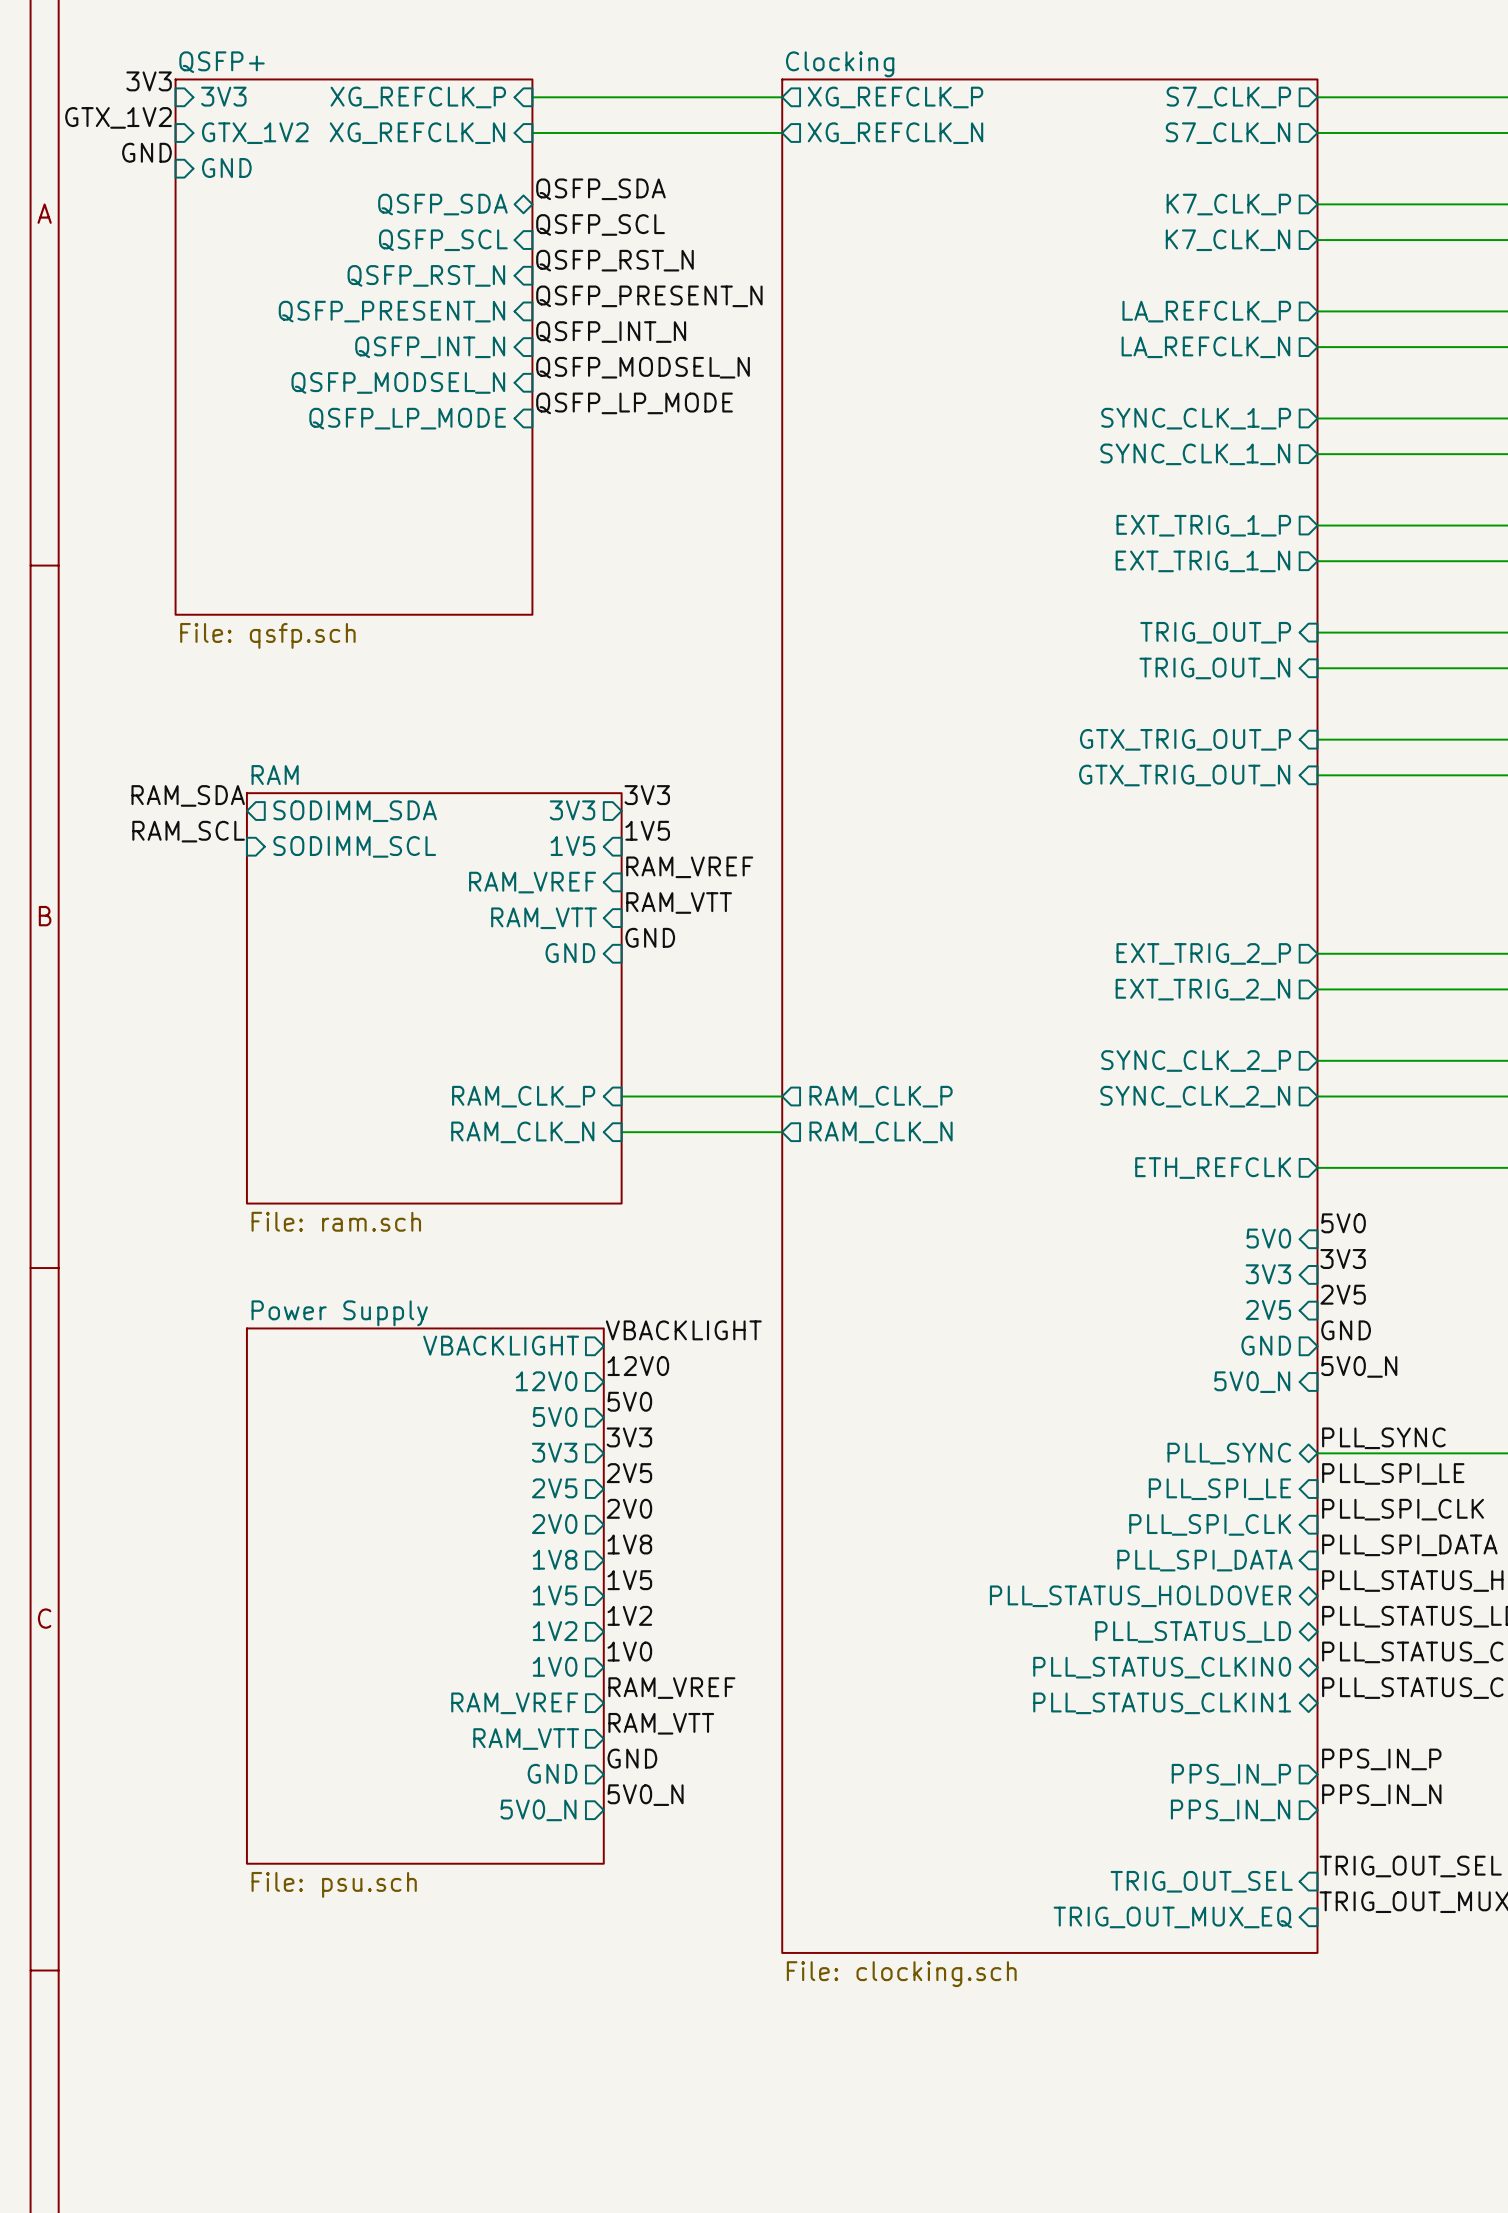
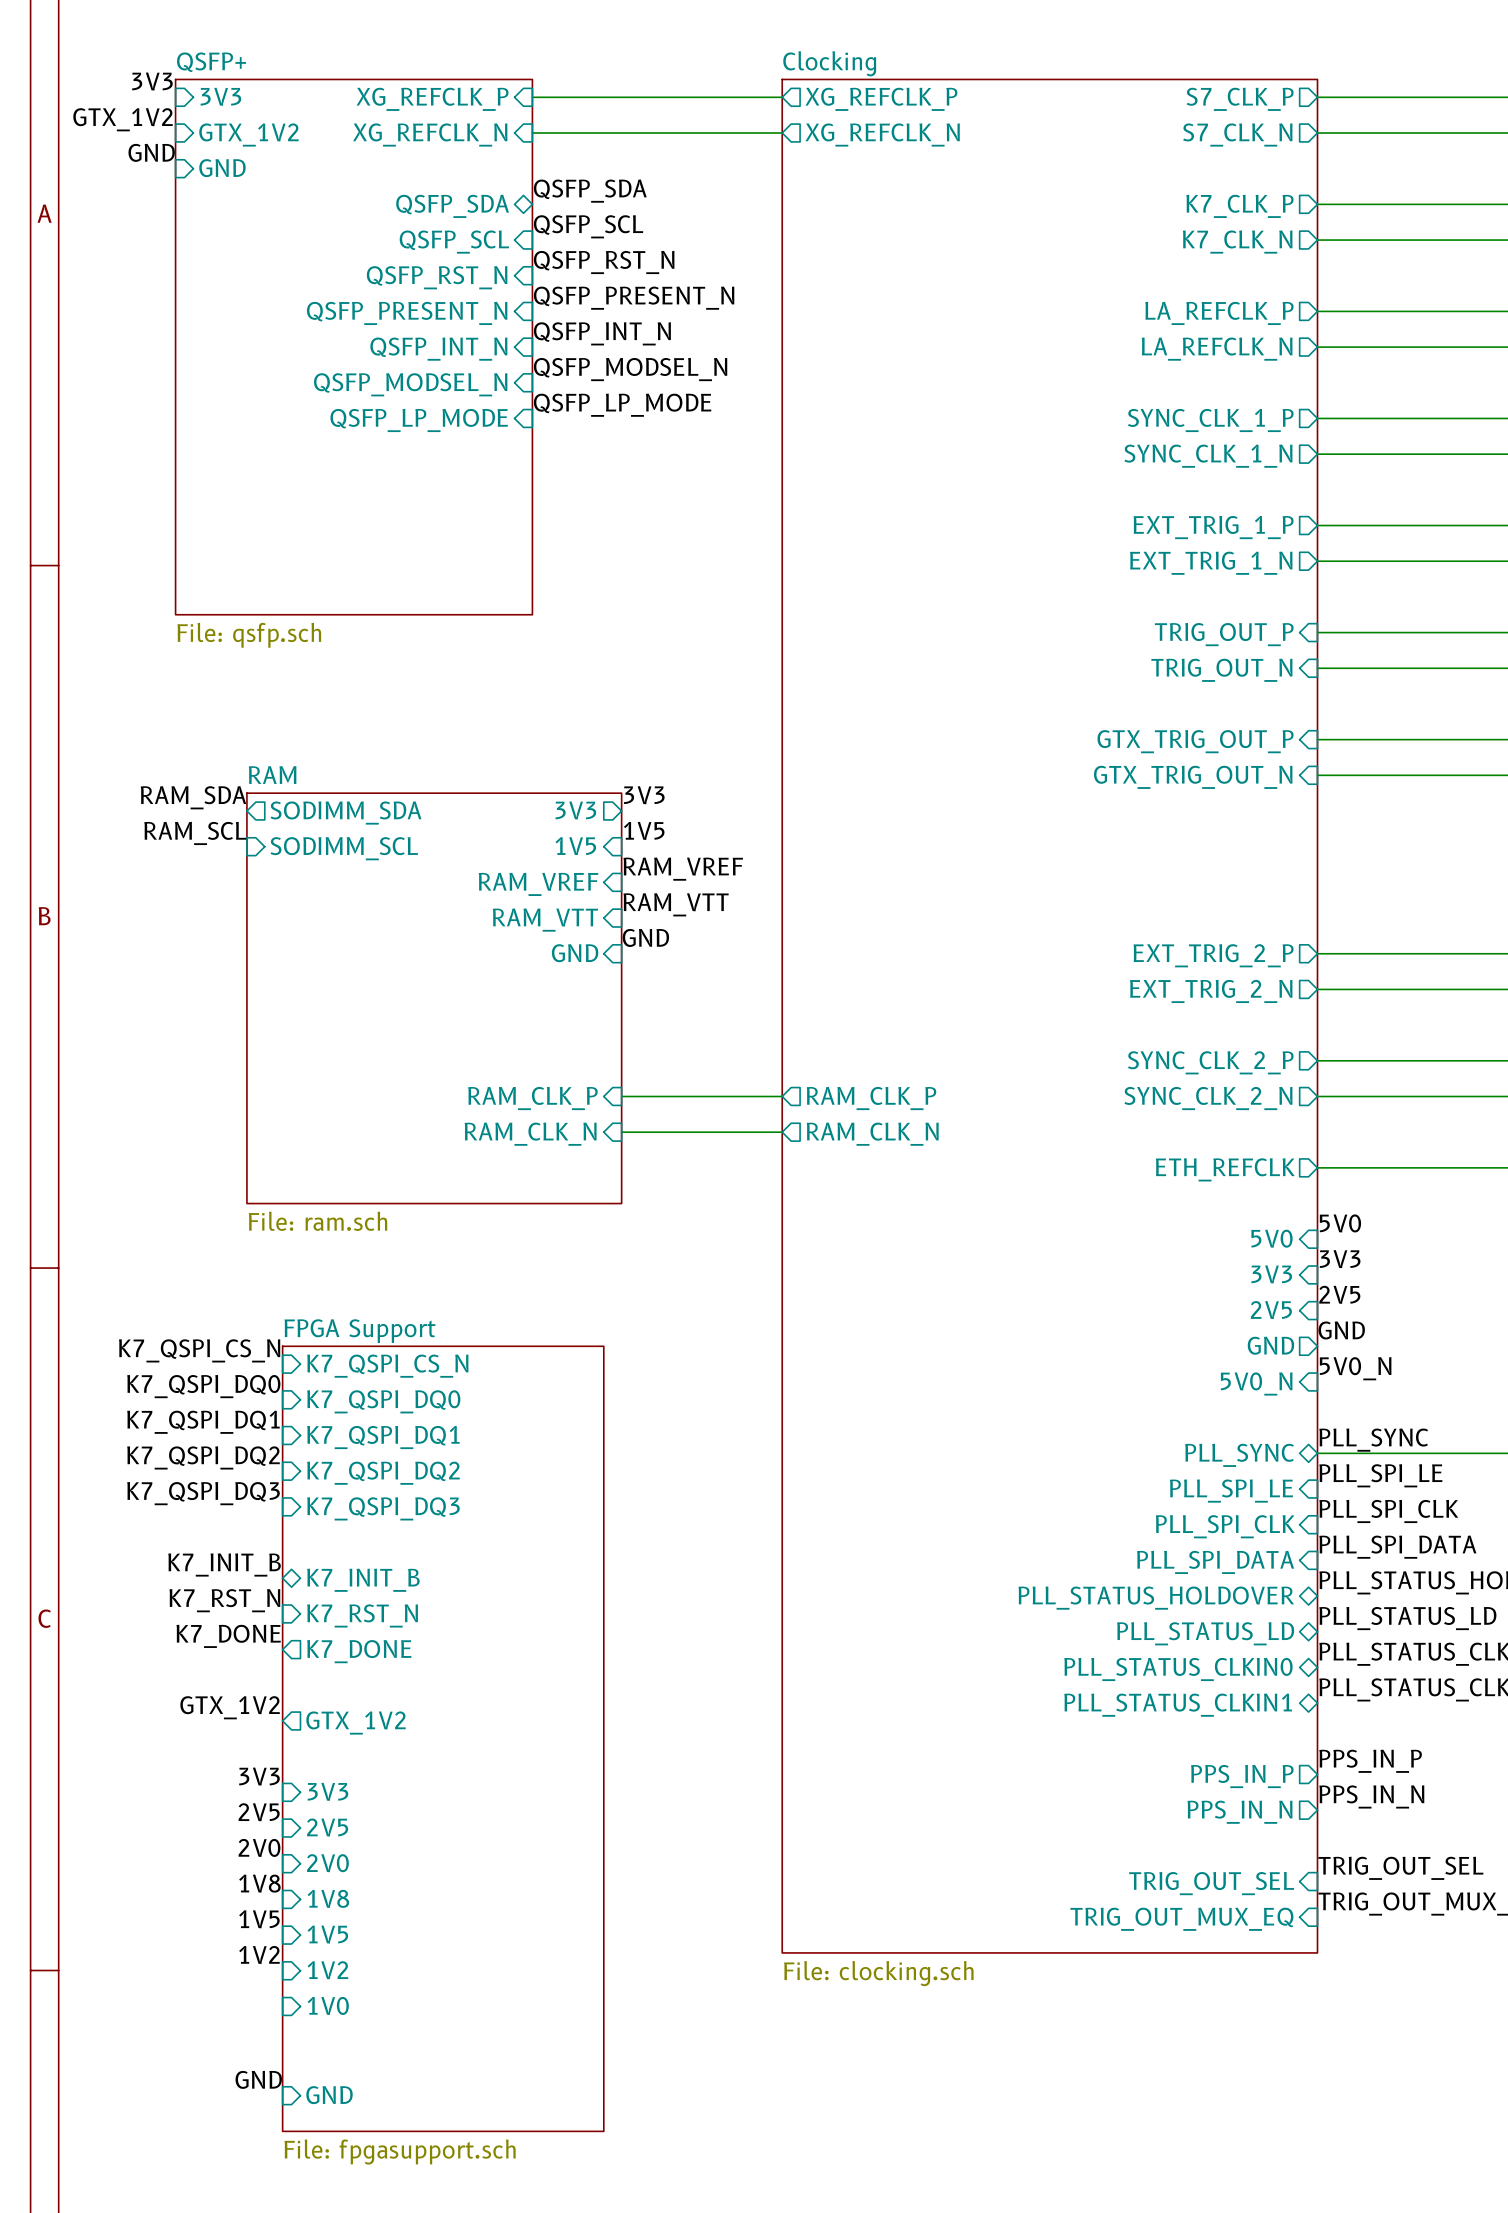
label: VBACKLIGHT (683, 1330) -> none
sheet pin: VBACKLIGHT (501, 1345) -> none
label: none -> K7_QSPI_CS_N (199, 1350)
sheet pin: none -> K7_QSPI_CS_N (387, 1366)
label: 12V0 (638, 1366) -> none
sheet pin: 12V0 (546, 1381) -> none
label: none -> K7_QSPI_DQ0 (203, 1386)
sheet pin: none -> K7_QSPI_DQ0 (383, 1401)
label: 5V0 (629, 1401) -> none
sheet pin: 5V0 (555, 1417) -> none
label: none -> K7_QSPI_DQ1 (203, 1422)
sheet pin: none -> K7_QSPI_DQ1 (383, 1437)
label: 3V3 (629, 1437) -> none
sheet pin: 3V3 (554, 1452) -> none
label: none -> K7_QSPI_DQ2 (203, 1457)
sheet pin: none -> K7_QSPI_DQ2 (383, 1473)
label: 2V5 (629, 1473) -> none
sheet pin: 2V5 (554, 1488) -> none
label: none -> K7_QSPI_DQ3 (203, 1493)
sheet pin: none -> K7_QSPI_DQ3 (383, 1508)
label: 2V0 (629, 1508) -> none
sheet pin: 2V0 (554, 1524) -> none
label: 1V8 (629, 1544) -> none
sheet pin: 1V8 (555, 1559) -> none
label: none -> K7_INIT_B (224, 1565)
sheet pin: none -> K7_INIT_B (363, 1580)
label: 1V5 (629, 1580) -> none
sheet pin: 1V5 (555, 1595) -> none
sheet Power Supply: File: psu.sch (425, 1596) -> none
label: none -> K7_RST_N (224, 1600)
sheet pin: none -> K7_RST_N (362, 1615)
label: 1V2 (629, 1615) -> none
sheet pin: 1V2 (555, 1631) -> none
label: none -> K7_DONE (228, 1636)
sheet pin: none -> K7_DONE (359, 1651)
label: 1V0 (629, 1651) -> none
sheet pin: 1V0 (555, 1666) -> none
label: RAM_VREF (671, 1688) -> none
sheet pin: RAM_VREF (514, 1703) -> none
label: none -> GTX_1V2 (230, 1707)
sheet pin: none -> GTX_1V2 (356, 1722)
label: RAM_VTT (661, 1723) -> none
sheet FPGA Support: none -> File: fpgasupport.sch (443, 1738)
sheet pin: RAM_VTT (526, 1739) -> none
label: GND (632, 1758) -> none
sheet pin: GND (552, 1773) -> none
label: none -> 3V3 (259, 1776)
sheet pin: none -> 3V3 (327, 1791)
label: 5V0_N (645, 1795) -> none
sheet pin: 5V0_N (538, 1810) -> none
label: none -> 2V5 (259, 1812)
sheet pin: none -> 2V5 (327, 1827)
label: none -> 2V0 (259, 1847)
sheet pin: none -> 2V0 (327, 1863)
label: none -> 1V8 (259, 1883)
sheet pin: none -> 1V8 (328, 1898)
label: none -> 1V5 (259, 1919)
sheet pin: none -> 1V5 (327, 1934)
label: none -> 1V2 (259, 1954)
sheet pin: none -> 1V2 (327, 1970)
sheet pin: none -> 1V0 (328, 2005)
label: none -> GND (258, 2079)
sheet pin: none -> GND (329, 2095)

